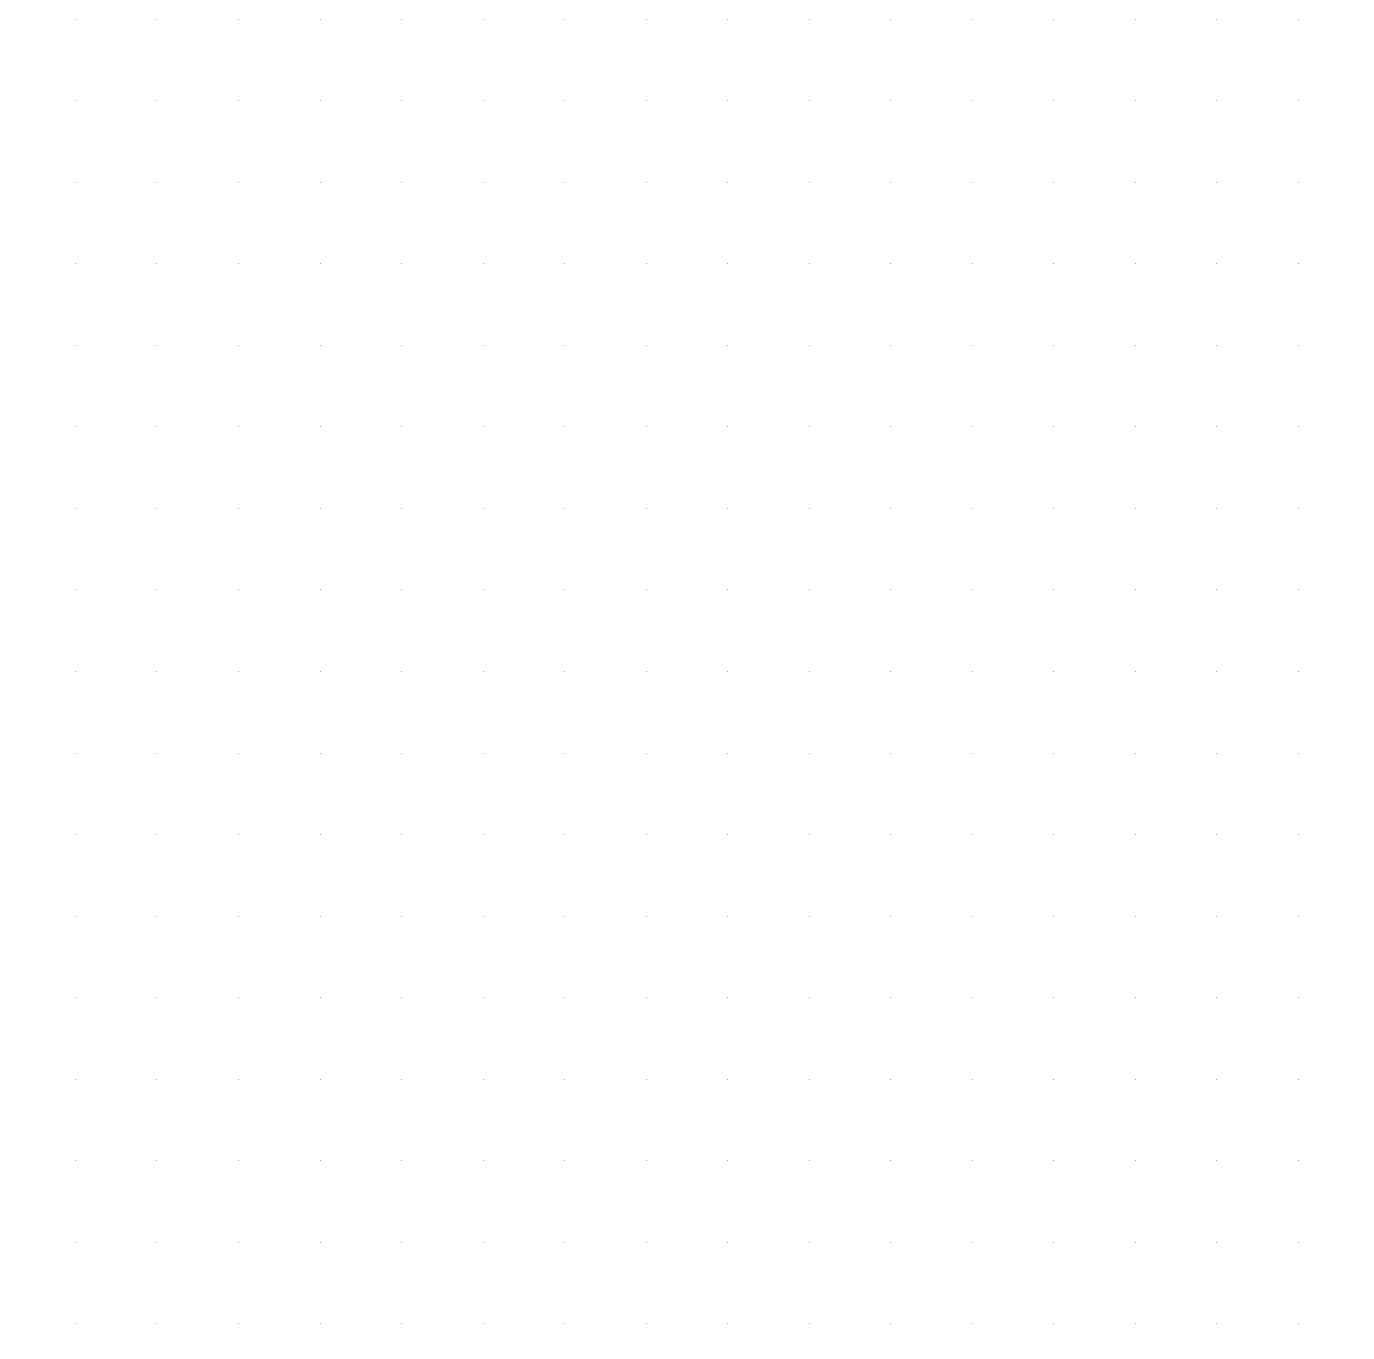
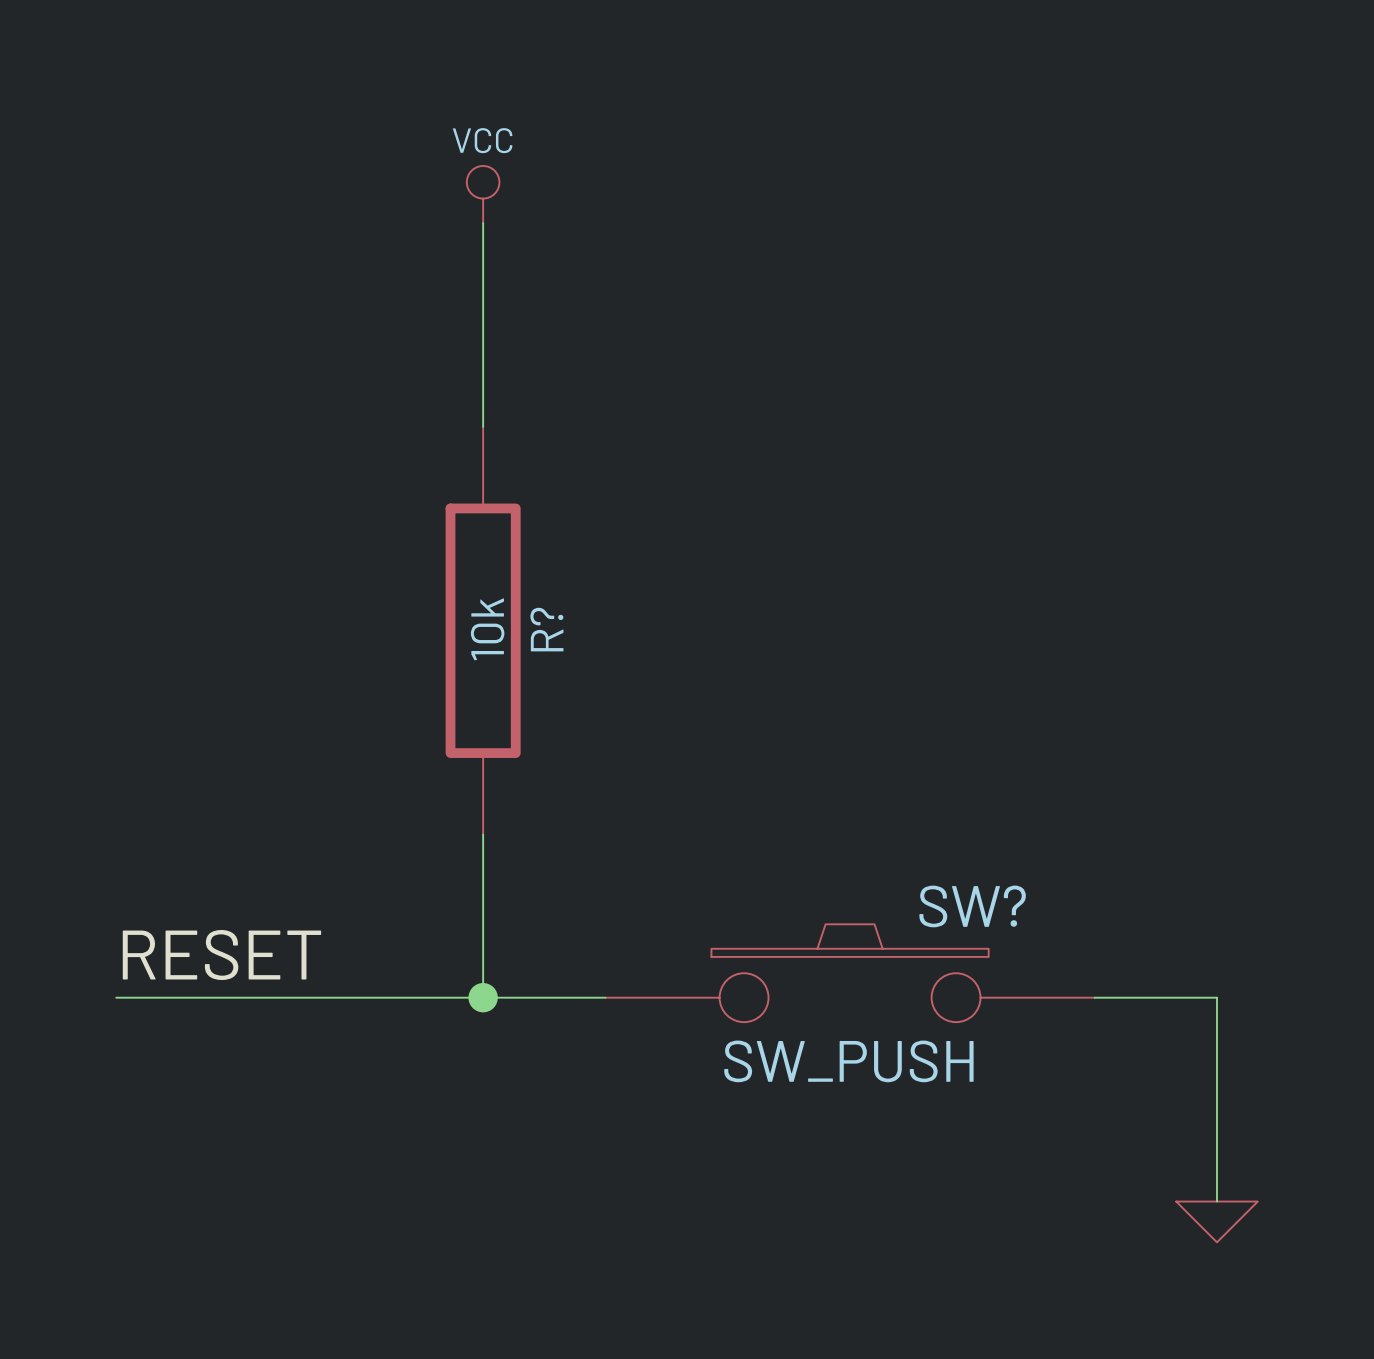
power symbol: none -> VCC (483, 194)
wire: none -> (483, 223) (483, 426)
R?: none -> 10k (483, 630)
wire: none -> (483, 834) (483, 997)
label: none -> RESET (221, 955)
SW?: none -> SW_PUSH (850, 973)
wire: none -> (116, 997) (605, 997)
junction: none -> (483, 997)
wire: none -> (1094, 997) (1216, 997) (1216, 1201)
power symbol: none -> (1216, 1221)

